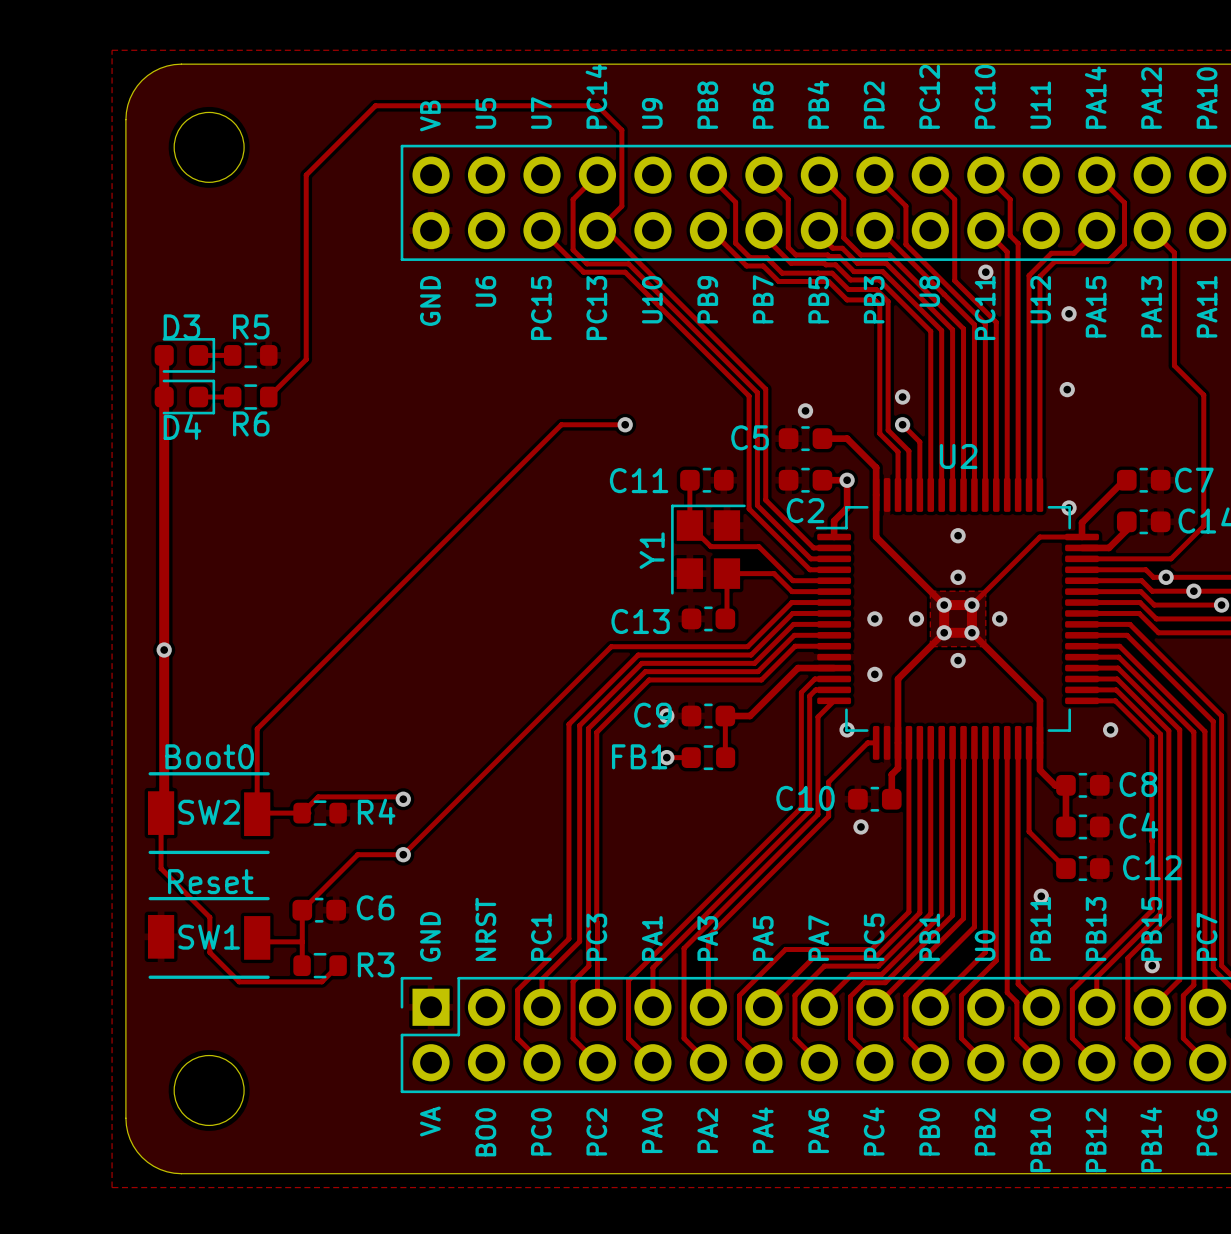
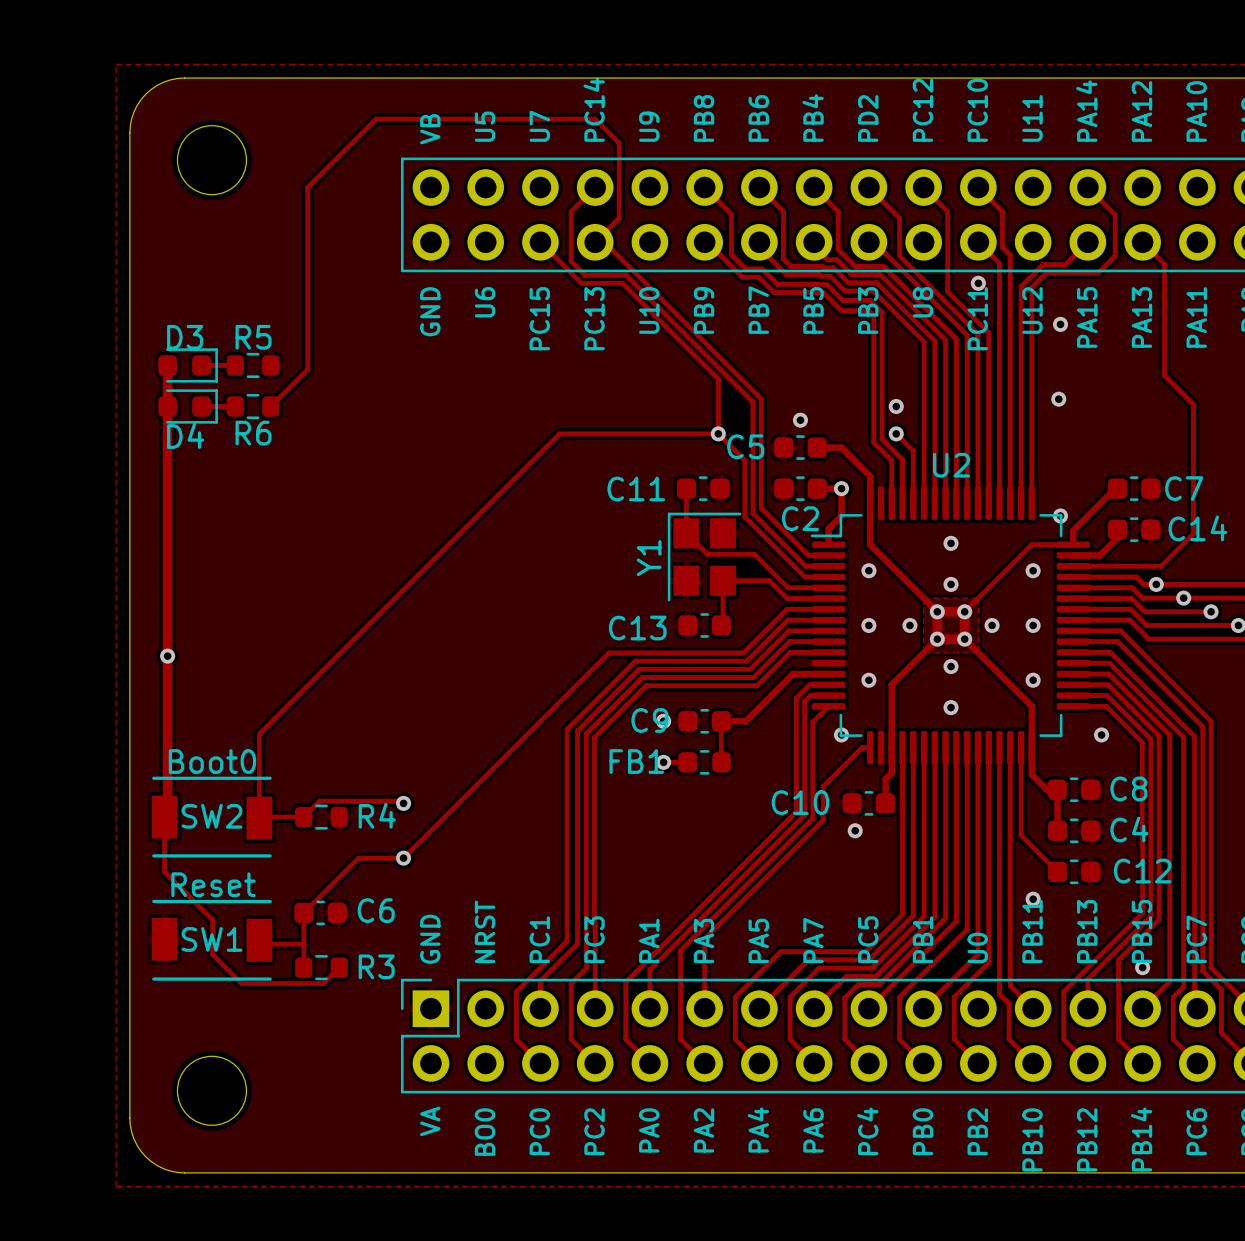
track: (722, 369) (749, 396) (749, 451) -> (718, 379) (718, 433)
track: none -> (622, 433) (718, 433)
via position: (625, 424) -> (718, 433)
track: none -> (718, 433) (744, 460)
via: none -> (868, 570)
via: none -> (1033, 570)
via: none -> (1033, 625)
via: none -> (1033, 680)
via: none -> (951, 707)

